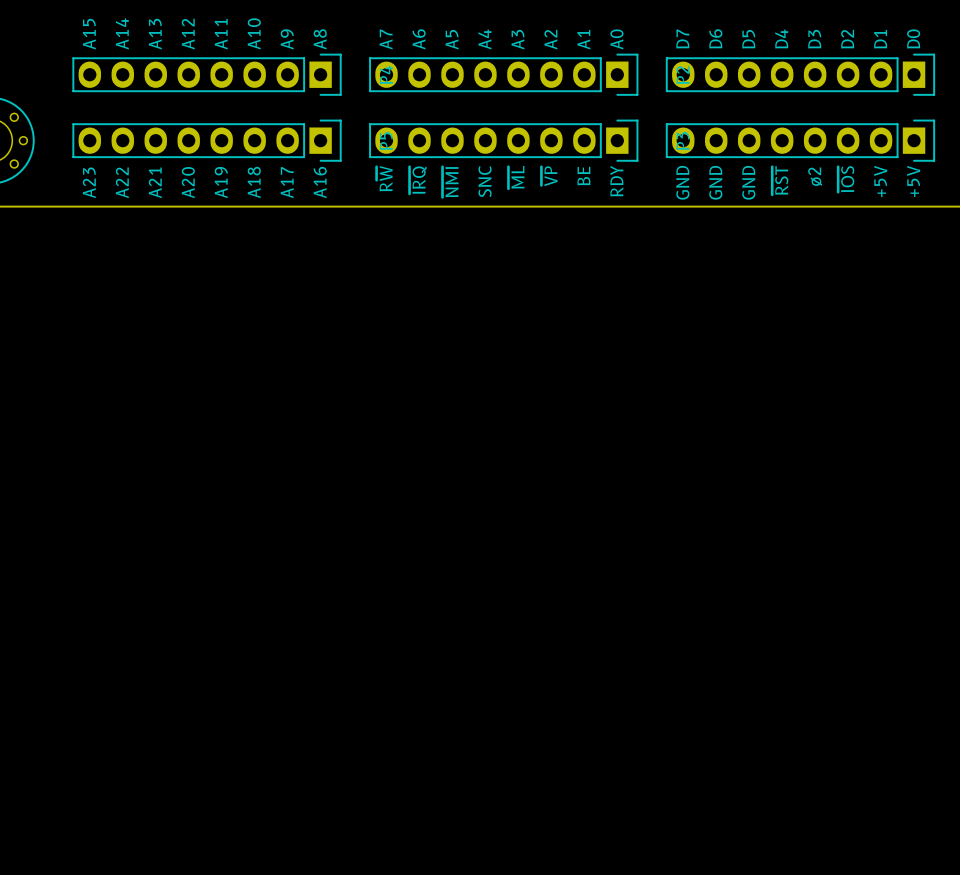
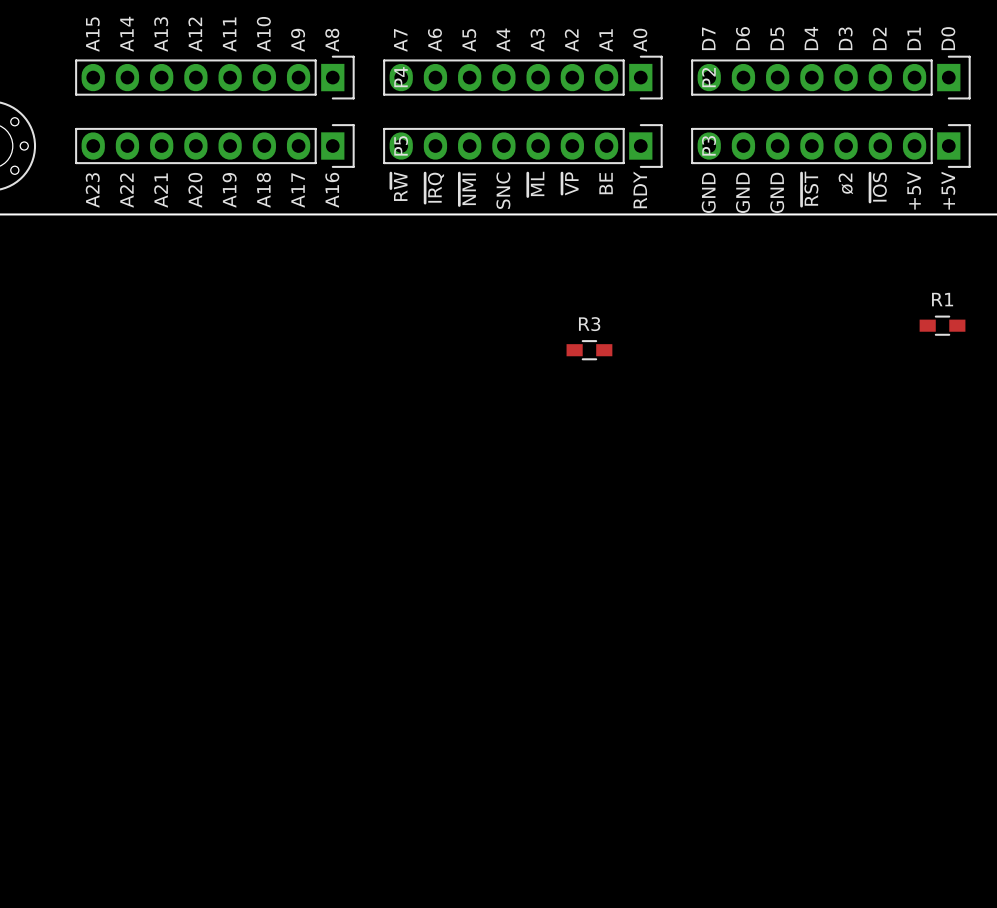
R1: none -> (942, 325)
R3: none -> (589, 350)

